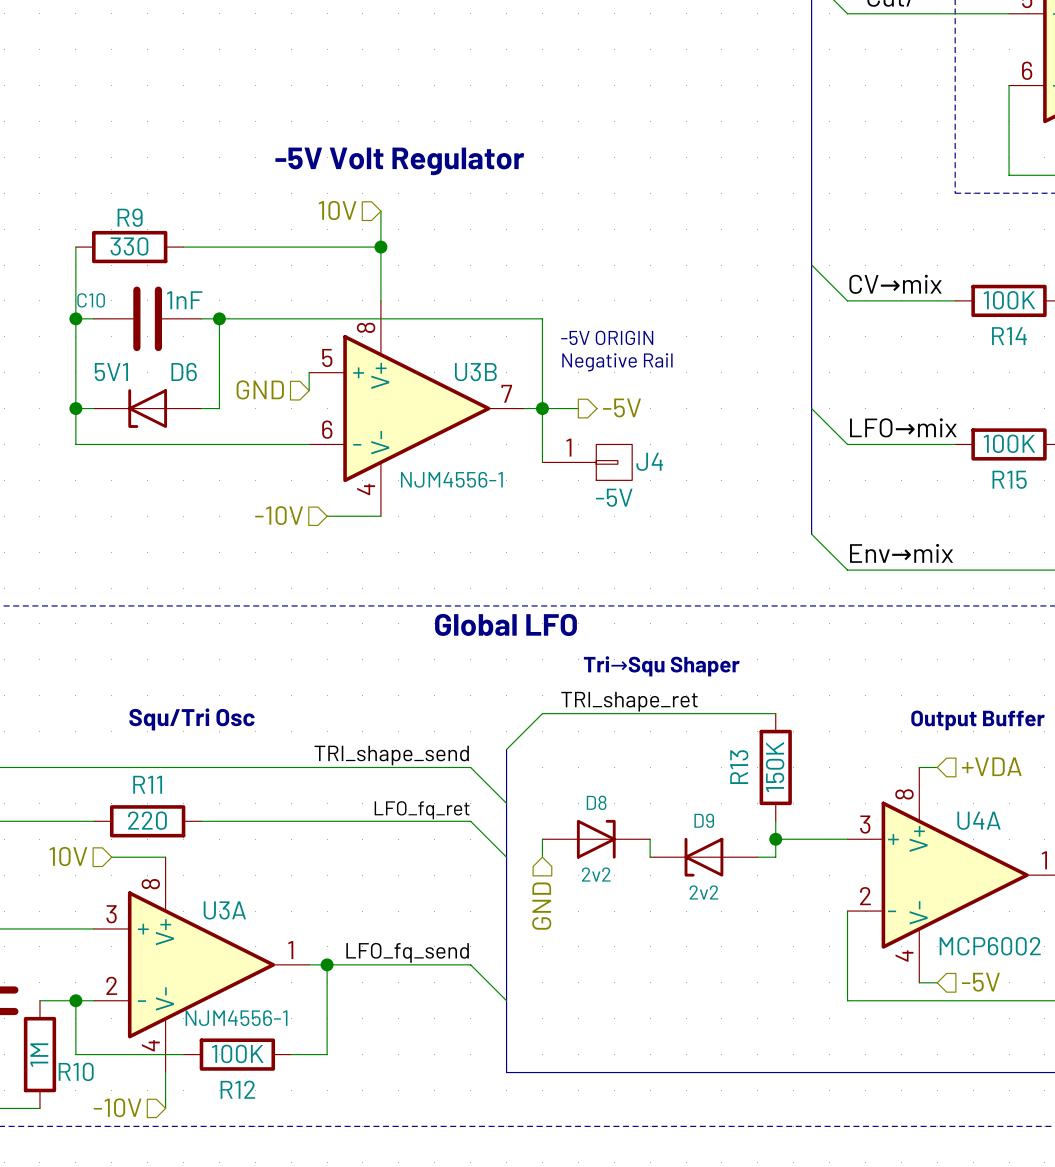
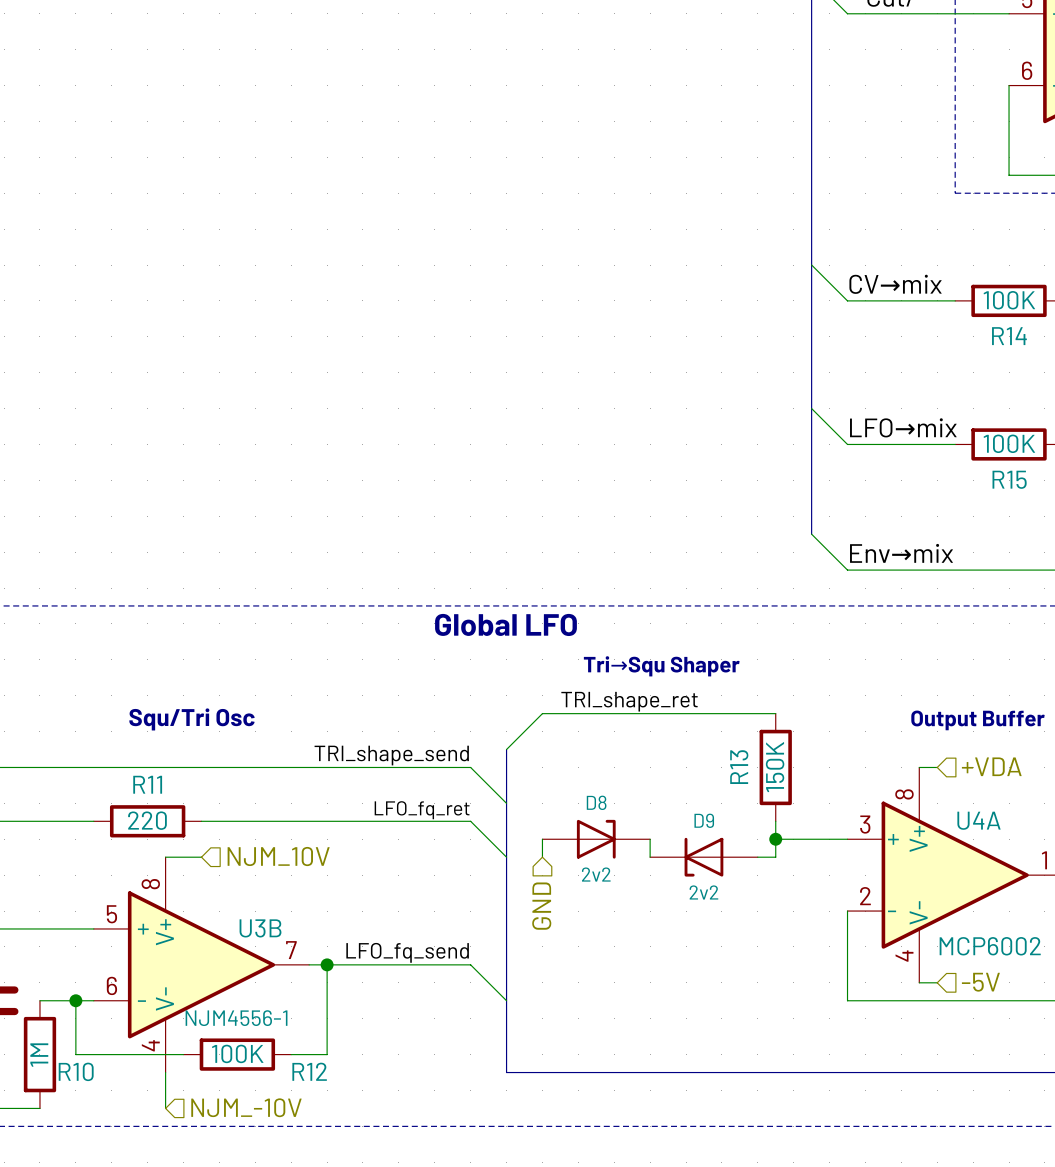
text: -5V Volt Regulator (399, 161) -> none
hierarchical label: 10V (337, 210) -> none
wire: (380, 211) (380, 300) -> none
wire: (75, 247) (75, 444) (309, 444) -> none
R9: 330 (129, 247) -> none
wire: (183, 247) (380, 247) -> none
junction: (380, 247) -> none
wire: (75, 318) (93, 318) -> none
junction: (75, 318) -> none
C10: 1nF (147, 318) -> none
wire: (201, 318) (542, 318) (542, 462) -> none
wire: (219, 318) (219, 408) (201, 408) -> none
junction: (219, 318) -> none
text: -5V ORIGIN (607, 337) -> none
text: Negative Rail (617, 362) -> none
wire: (309, 372) (309, 390) -> none
hierarchical label: GND (260, 389) -> none
hierarchical label: -5V (621, 407) -> none
wire: (75, 408) (93, 408) -> none
junction: (75, 408) -> none
D6: 5V1 (147, 408) -> none
U3B position: (416, 408) -> (201, 964)
wire: (524, 408) (578, 408) -> none
junction: (542, 408) -> none
J4: -5V (587, 462) -> none
U3B value position: NJM4556-1 (451, 479) -> NJM4556-1 (236, 1018)
hierarchical label: -10V (279, 515) -> none
wire: (327, 516) (380, 516) -> none
hierarchical label: 10V (68, 856) -> none
hierarchical label: none -> NJM_10V (278, 856)
wire: (111, 857) (165, 857) -> (201, 857) (165, 857)
U3A: NJM4556-1 (201, 964) -> none
R12 name position: R12 (237, 1089) -> R12 (309, 1071)
hierarchical label: -10V (117, 1107) -> none
hierarchical label: none -> NJM_-10V (246, 1107)

